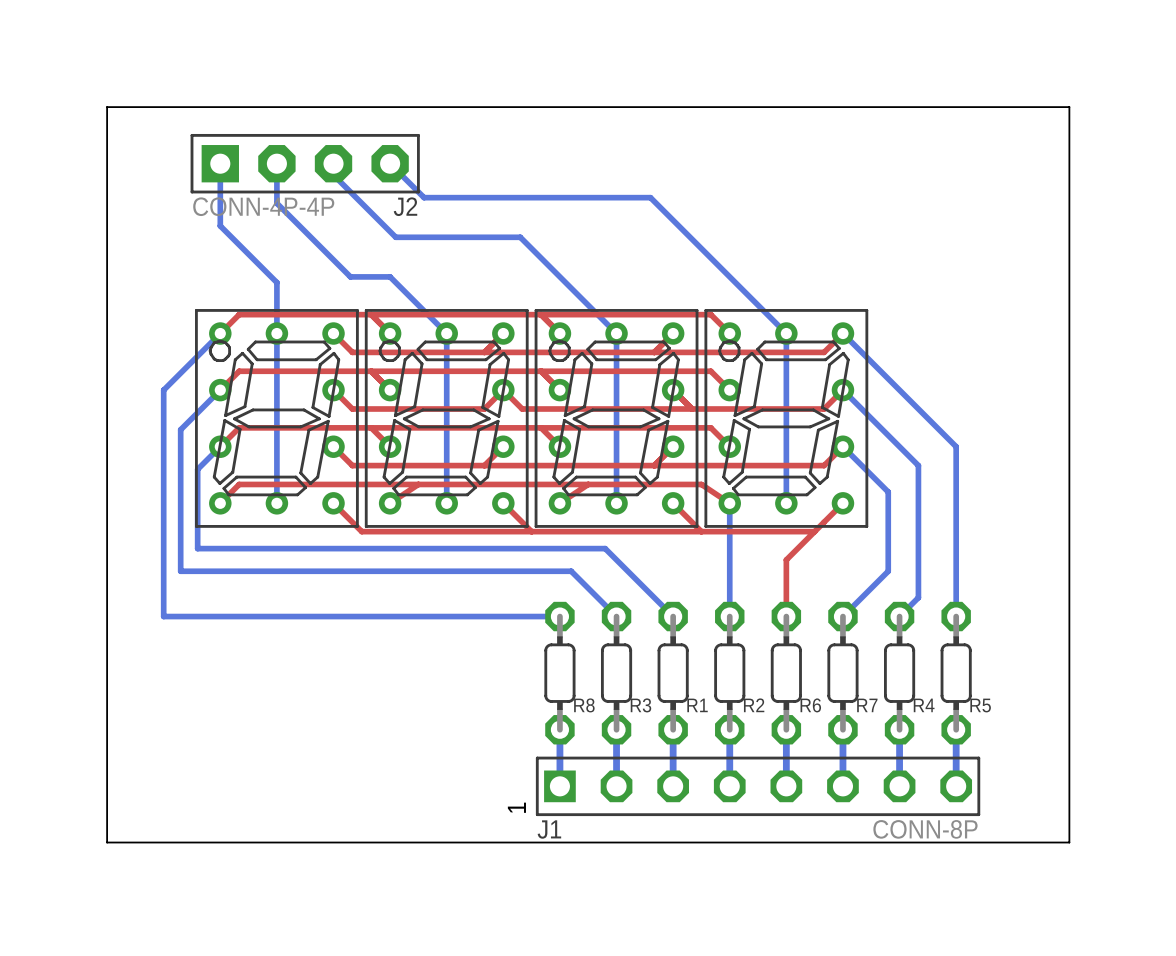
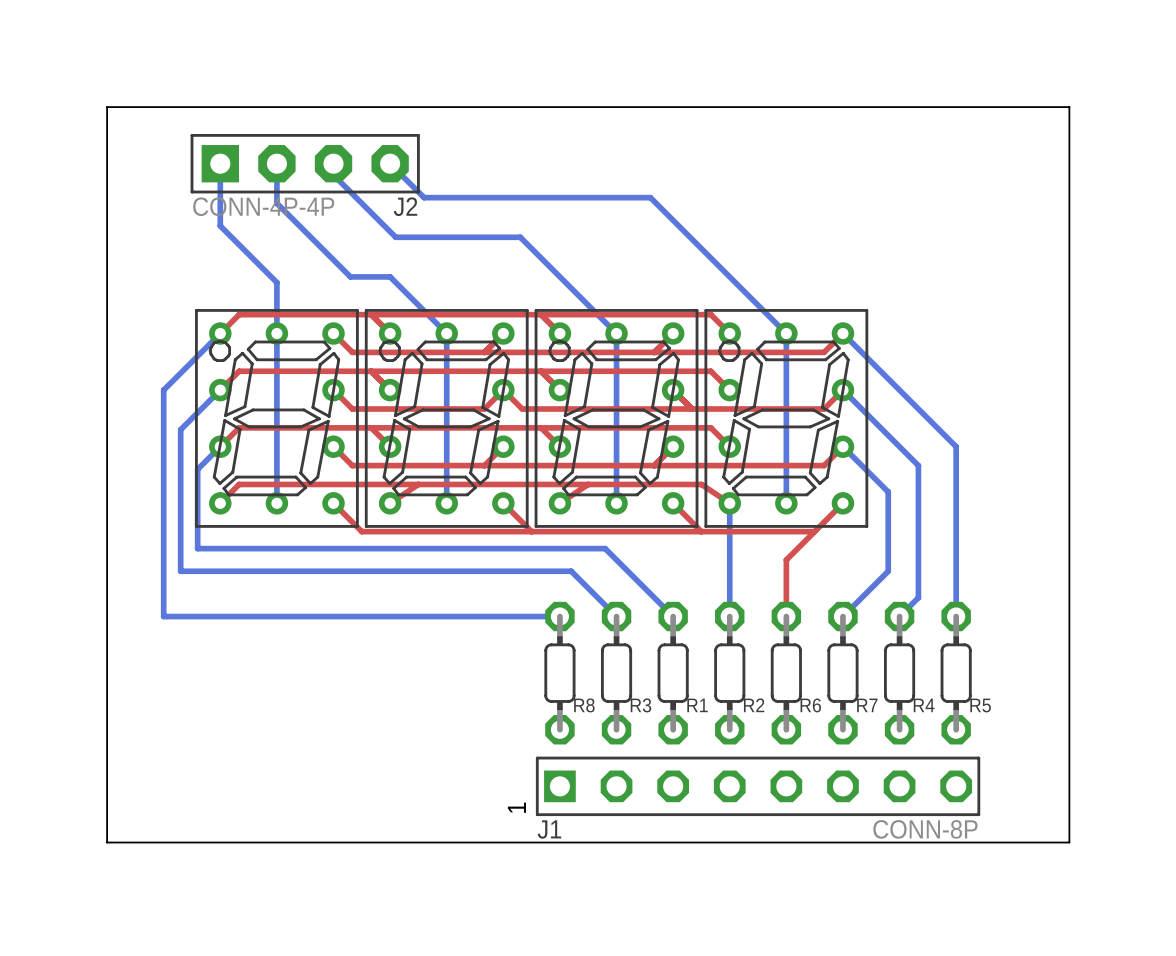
bottom track: (559, 729) (559, 786) -> none
bottom track: (616, 729) (616, 786) -> none
bottom track: (673, 729) (673, 786) -> none
bottom track: (729, 729) (729, 786) -> none
bottom track: (786, 729) (786, 786) -> none
bottom track: (842, 729) (842, 786) -> none
bottom track: (899, 729) (899, 786) -> none
bottom track: (956, 729) (956, 786) -> none

